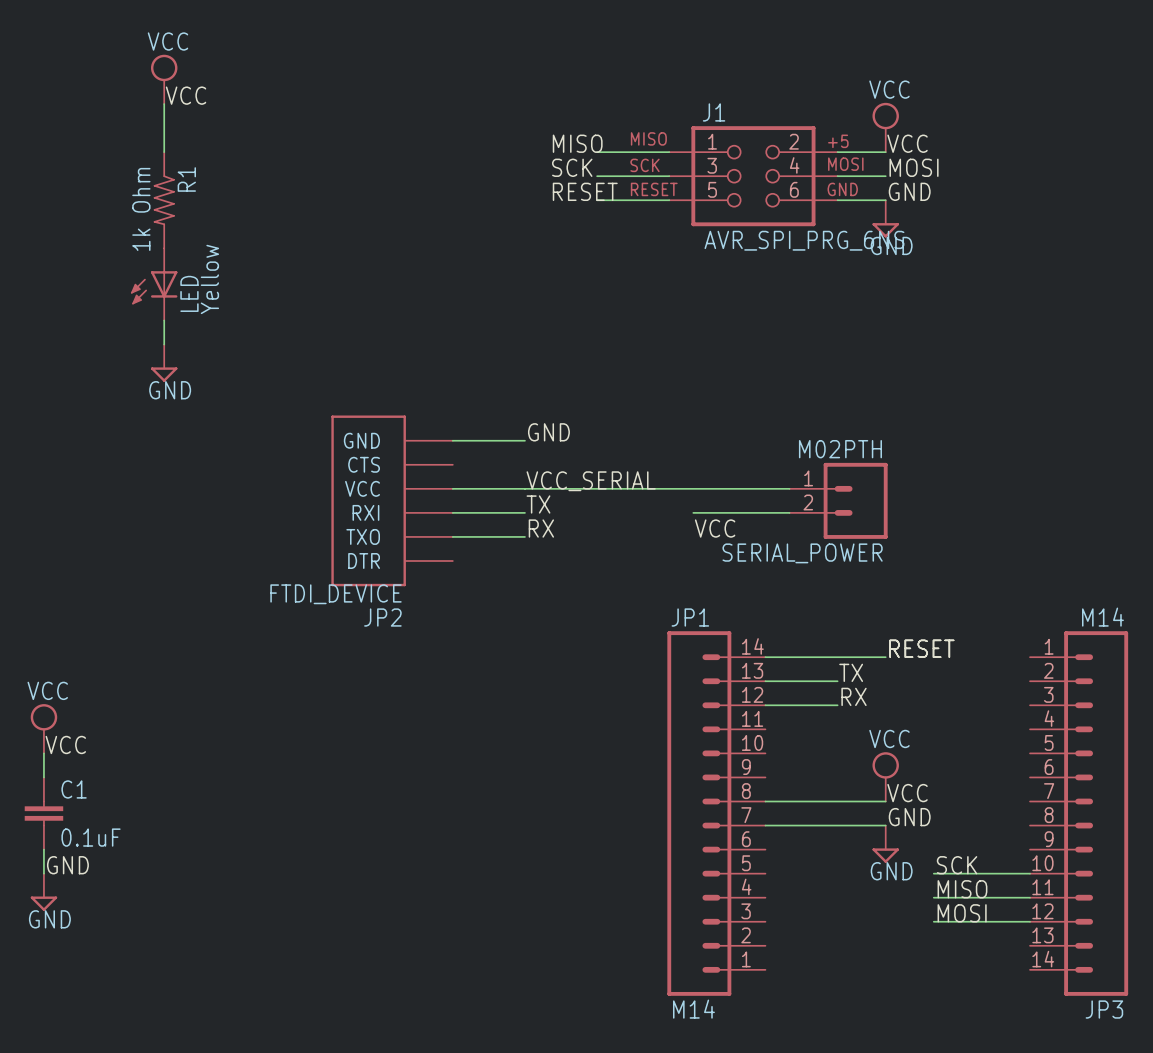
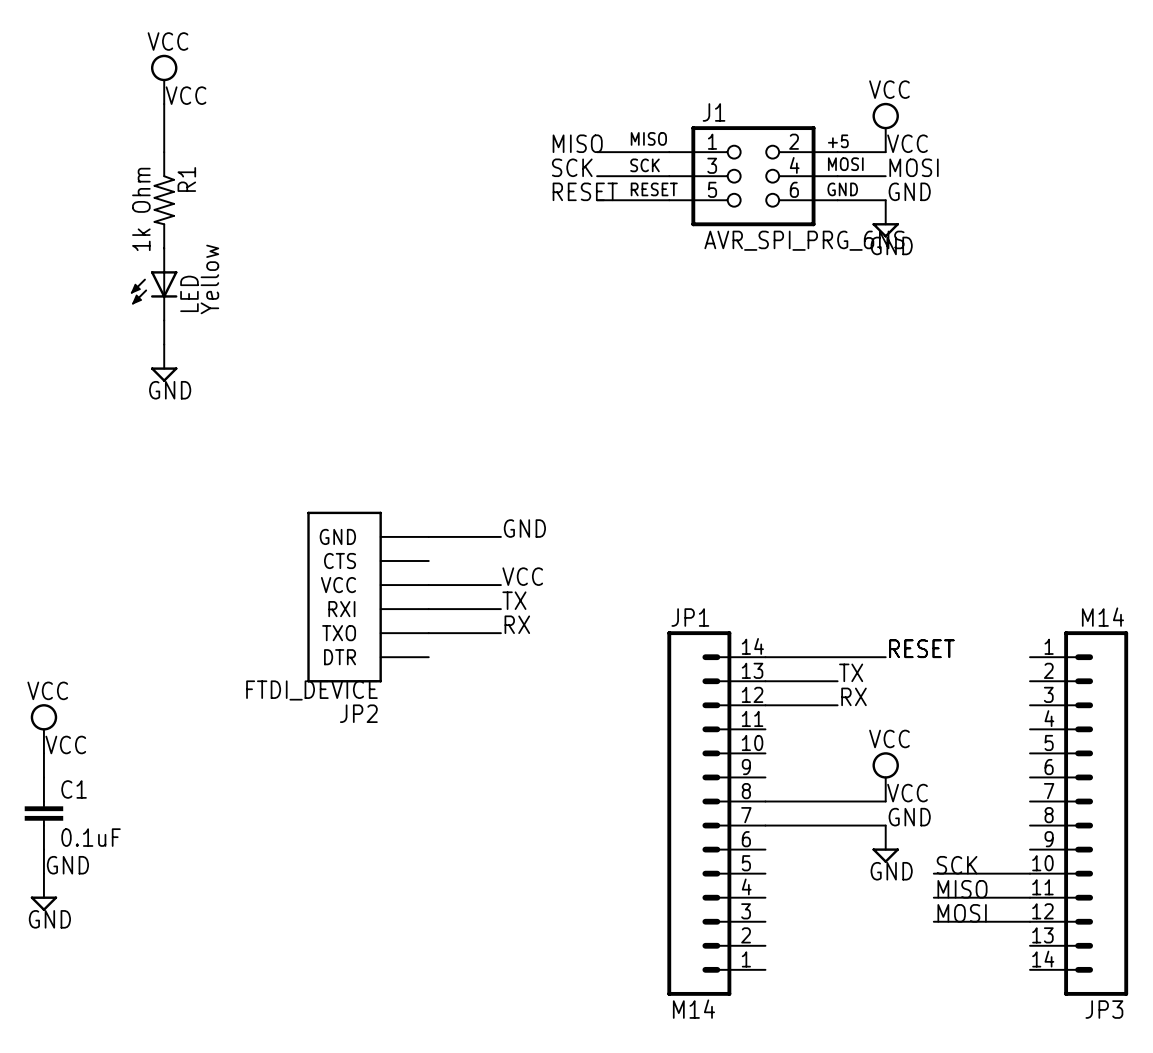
label position: GND (548, 432) -> GND (524, 528)
wire: (452, 440) (524, 440) -> (428, 609) (500, 609)
label: VCC_SERIAL (591, 481) -> none
wire: (452, 488) (789, 488) -> none
JP2 position: (392, 500) -> (368, 597)
SERIAL_POWER: M02PTH (838, 500) -> none
label position: TX (538, 504) -> TX (514, 600)
wire: (452, 512) (524, 512) -> (428, 585) (500, 585)
wire: (693, 512) (789, 512) -> none
label position: RX (541, 528) -> RX (517, 624)
label position: VCC (715, 528) -> VCC (522, 576)
wire: none -> (428, 633) (500, 633)

